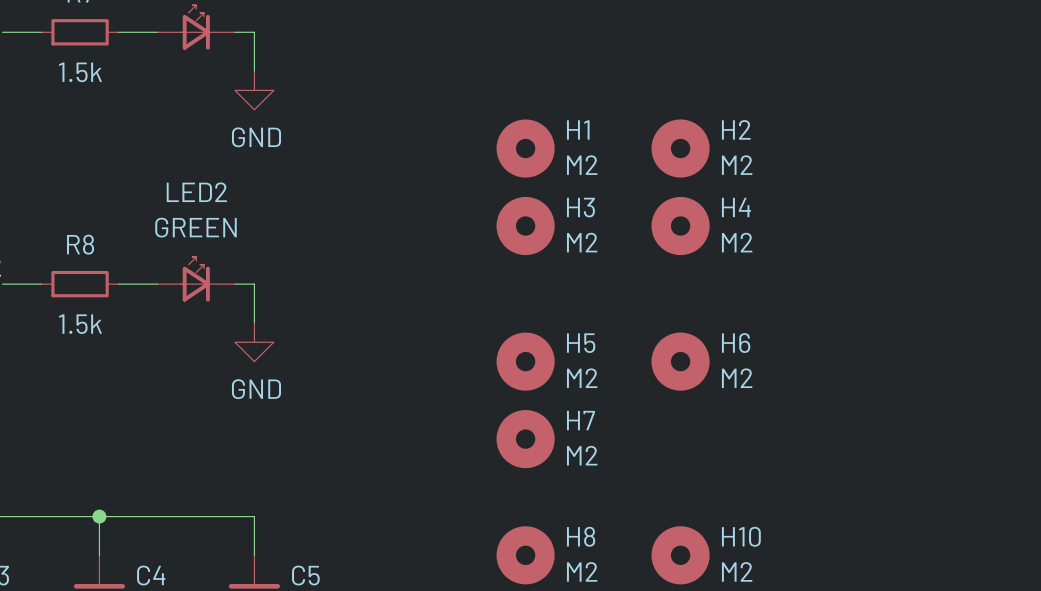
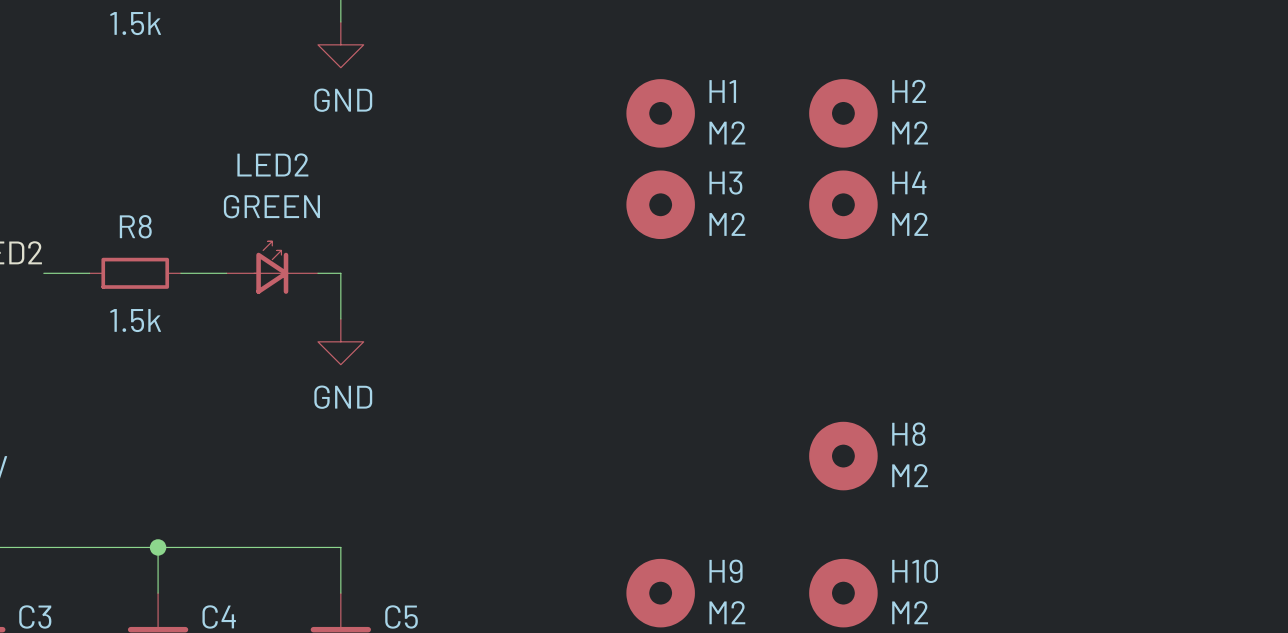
H5: M2 (525, 361) -> none
H6: M2 (680, 361) -> none
H7: M2 (525, 439) -> none
H8: none -> M2 (843, 456)
H8 name: H8 (581, 536) -> H9 (726, 571)

